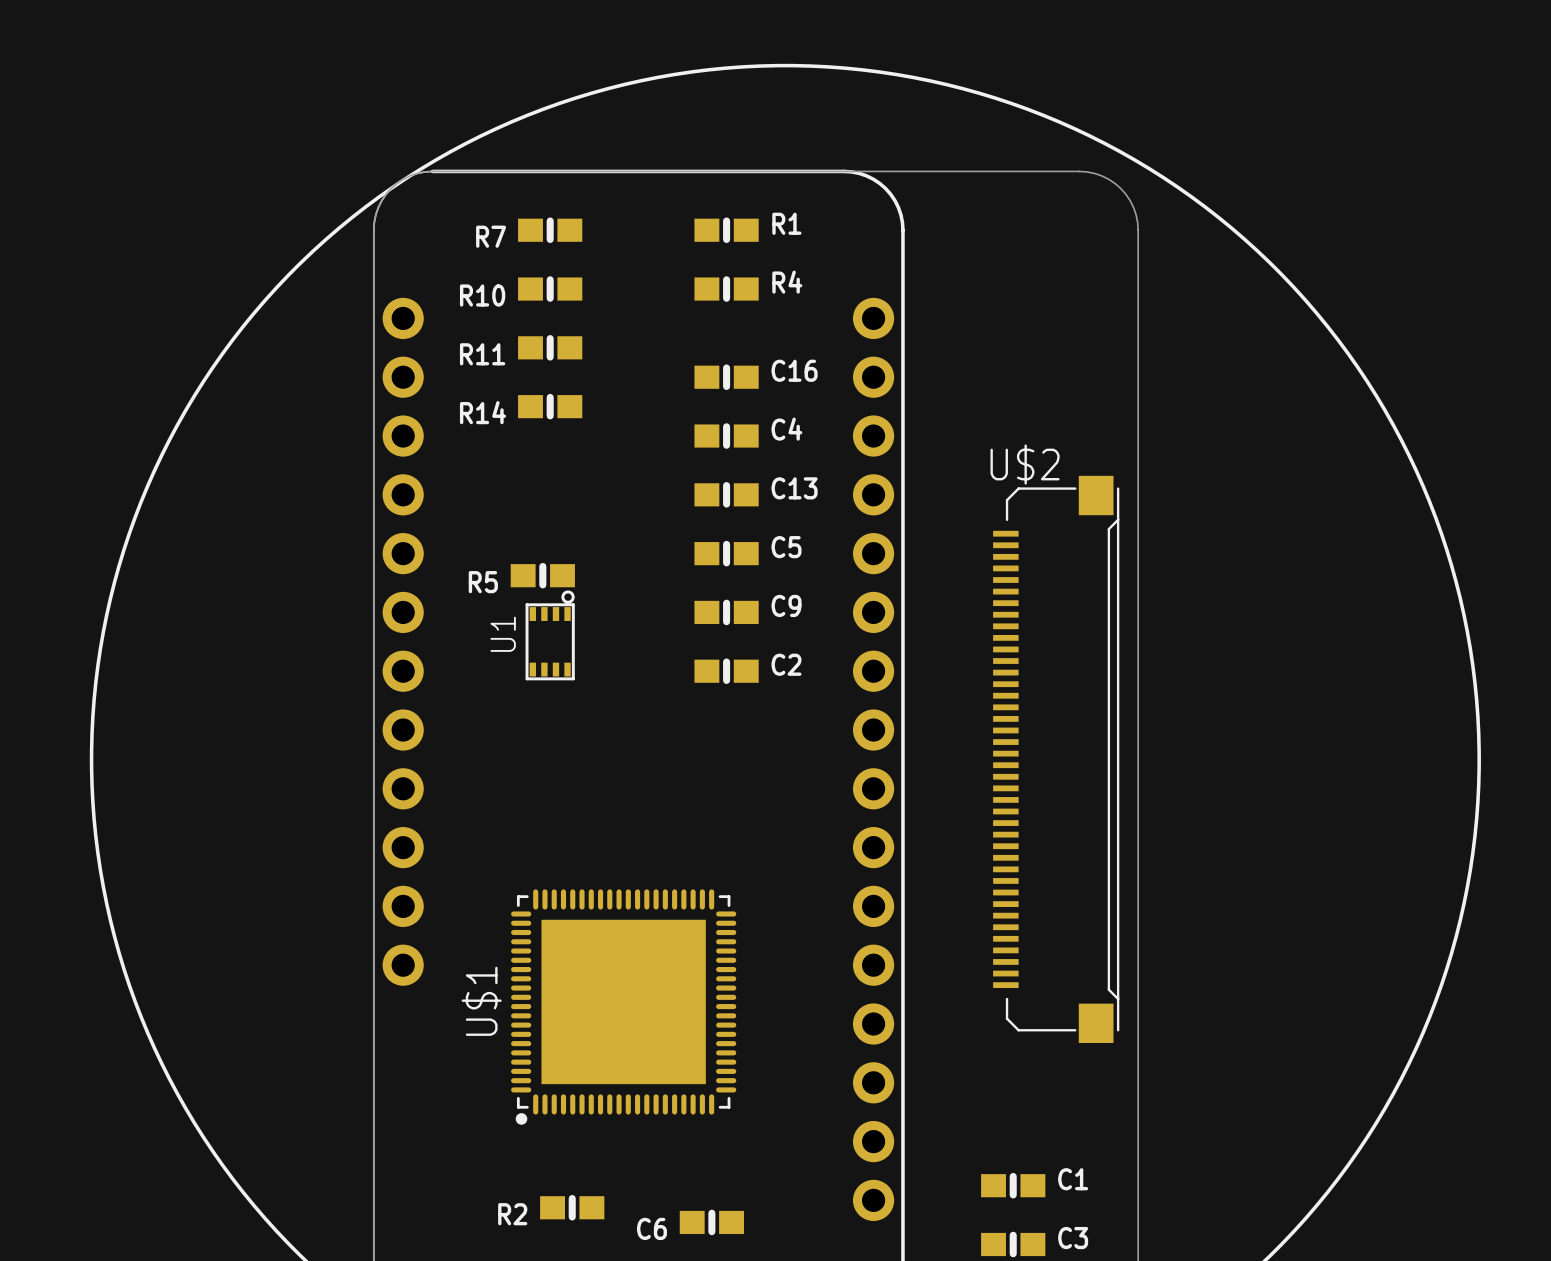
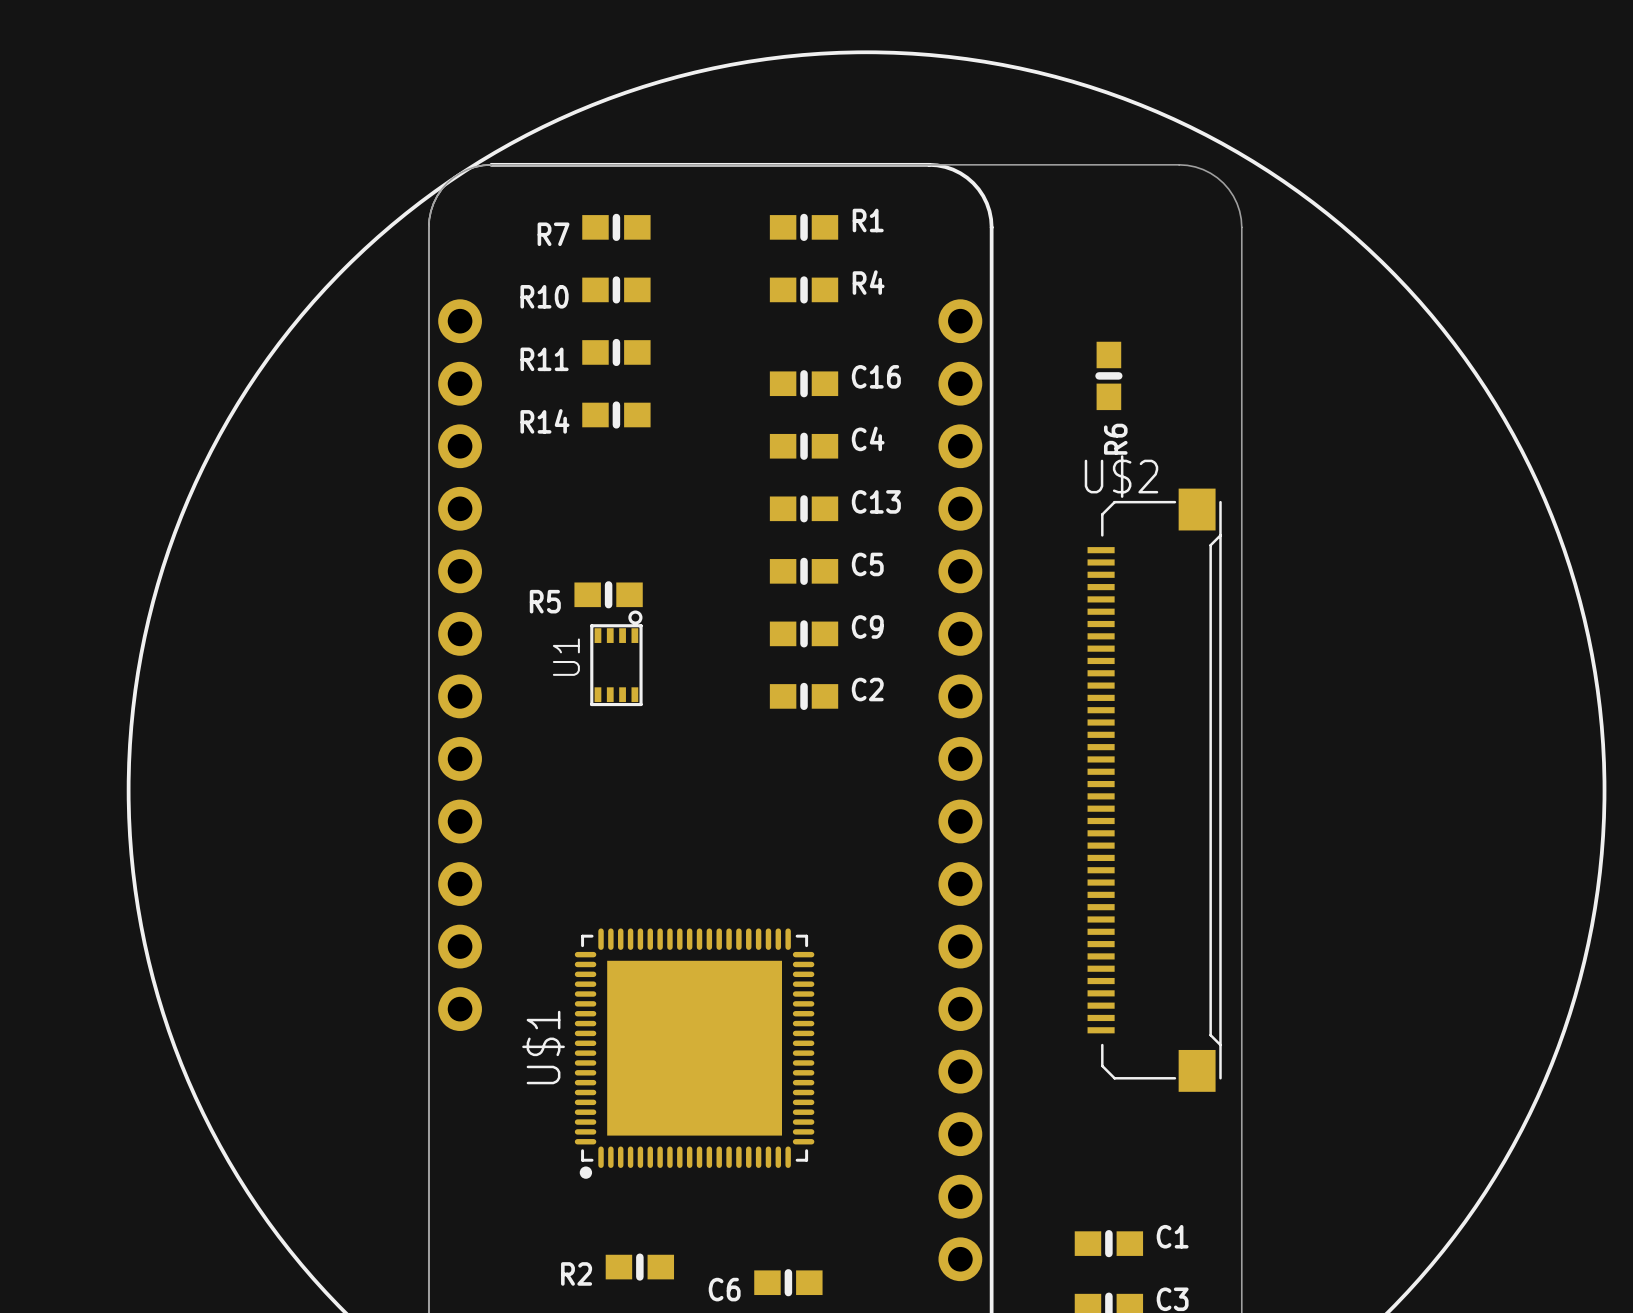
R6: none -> (1108, 375)

